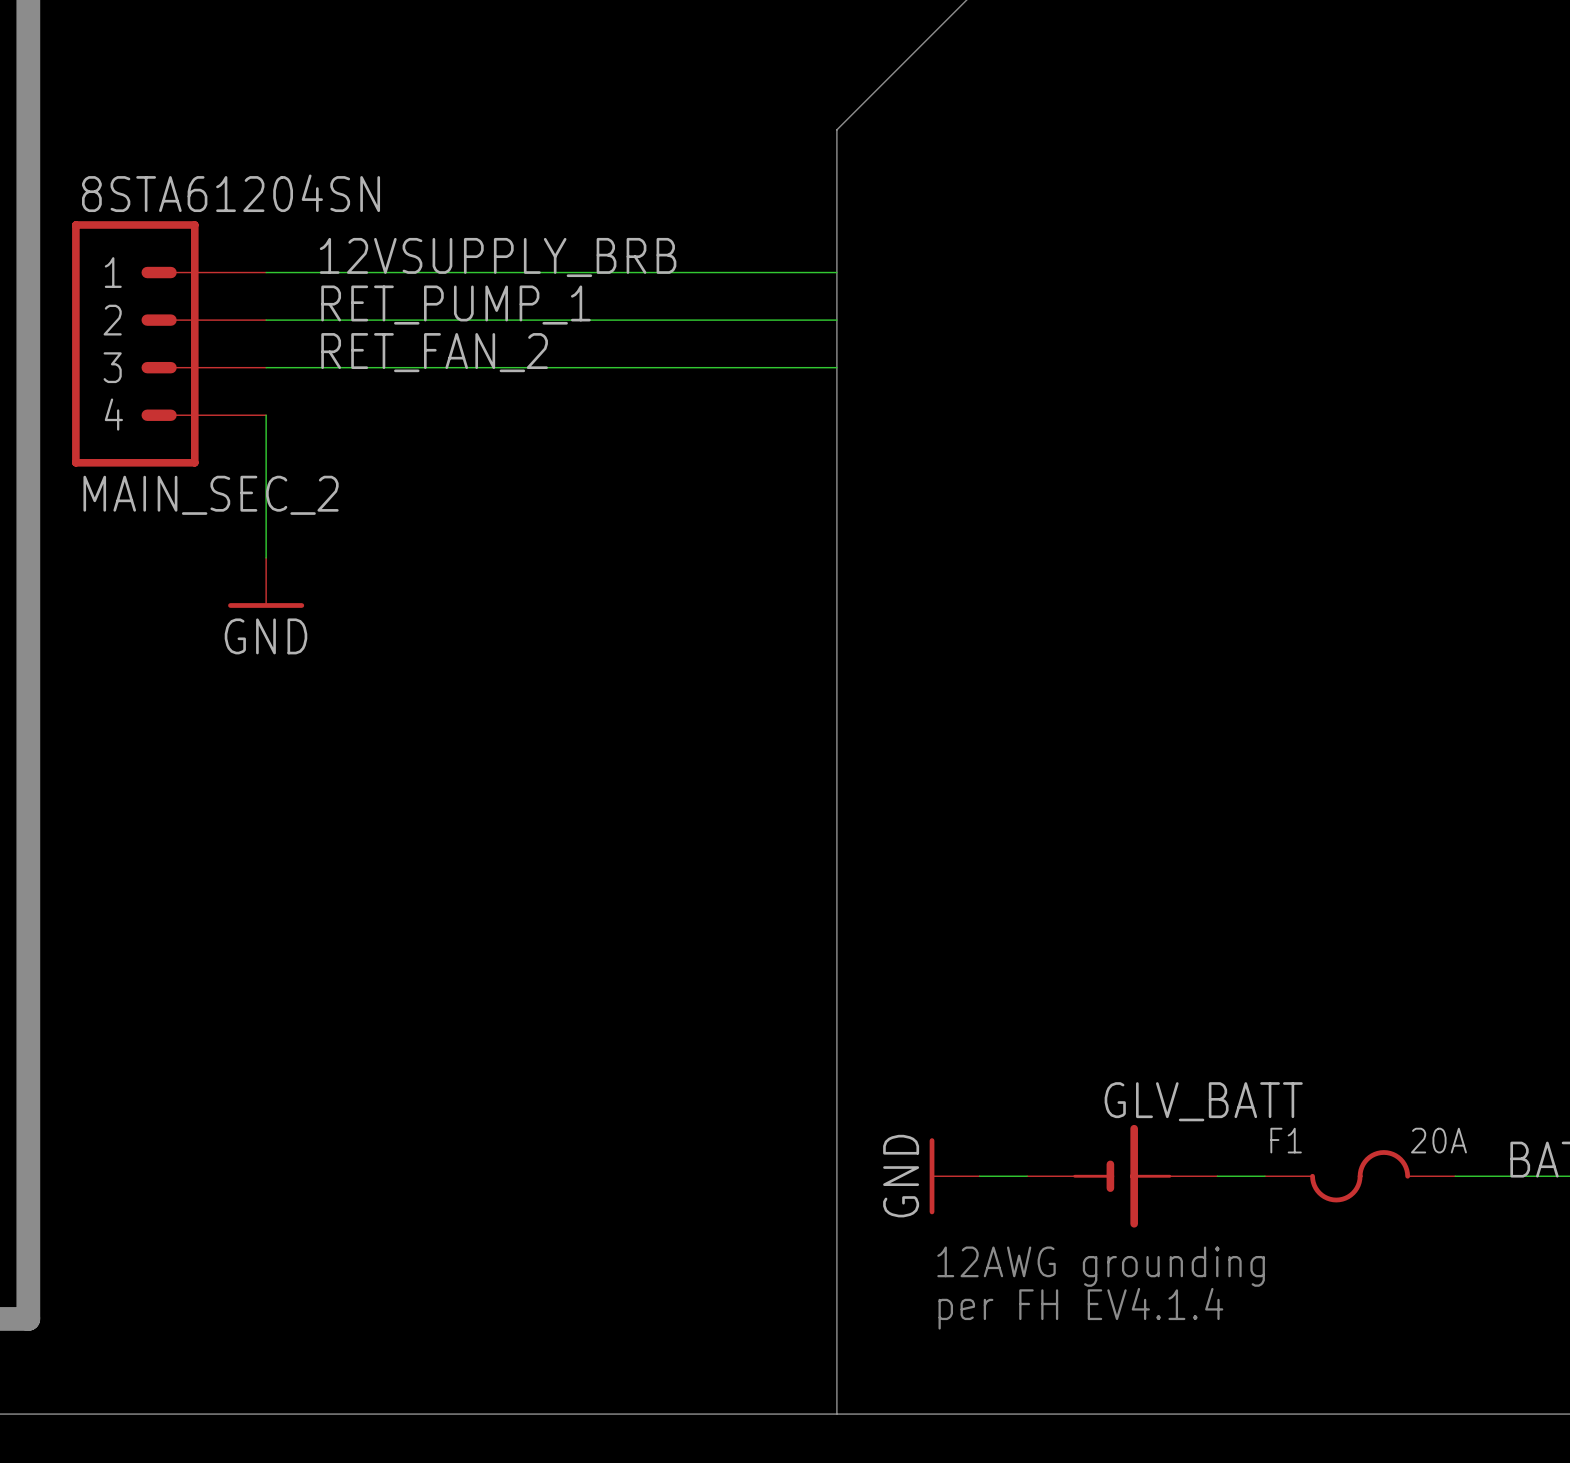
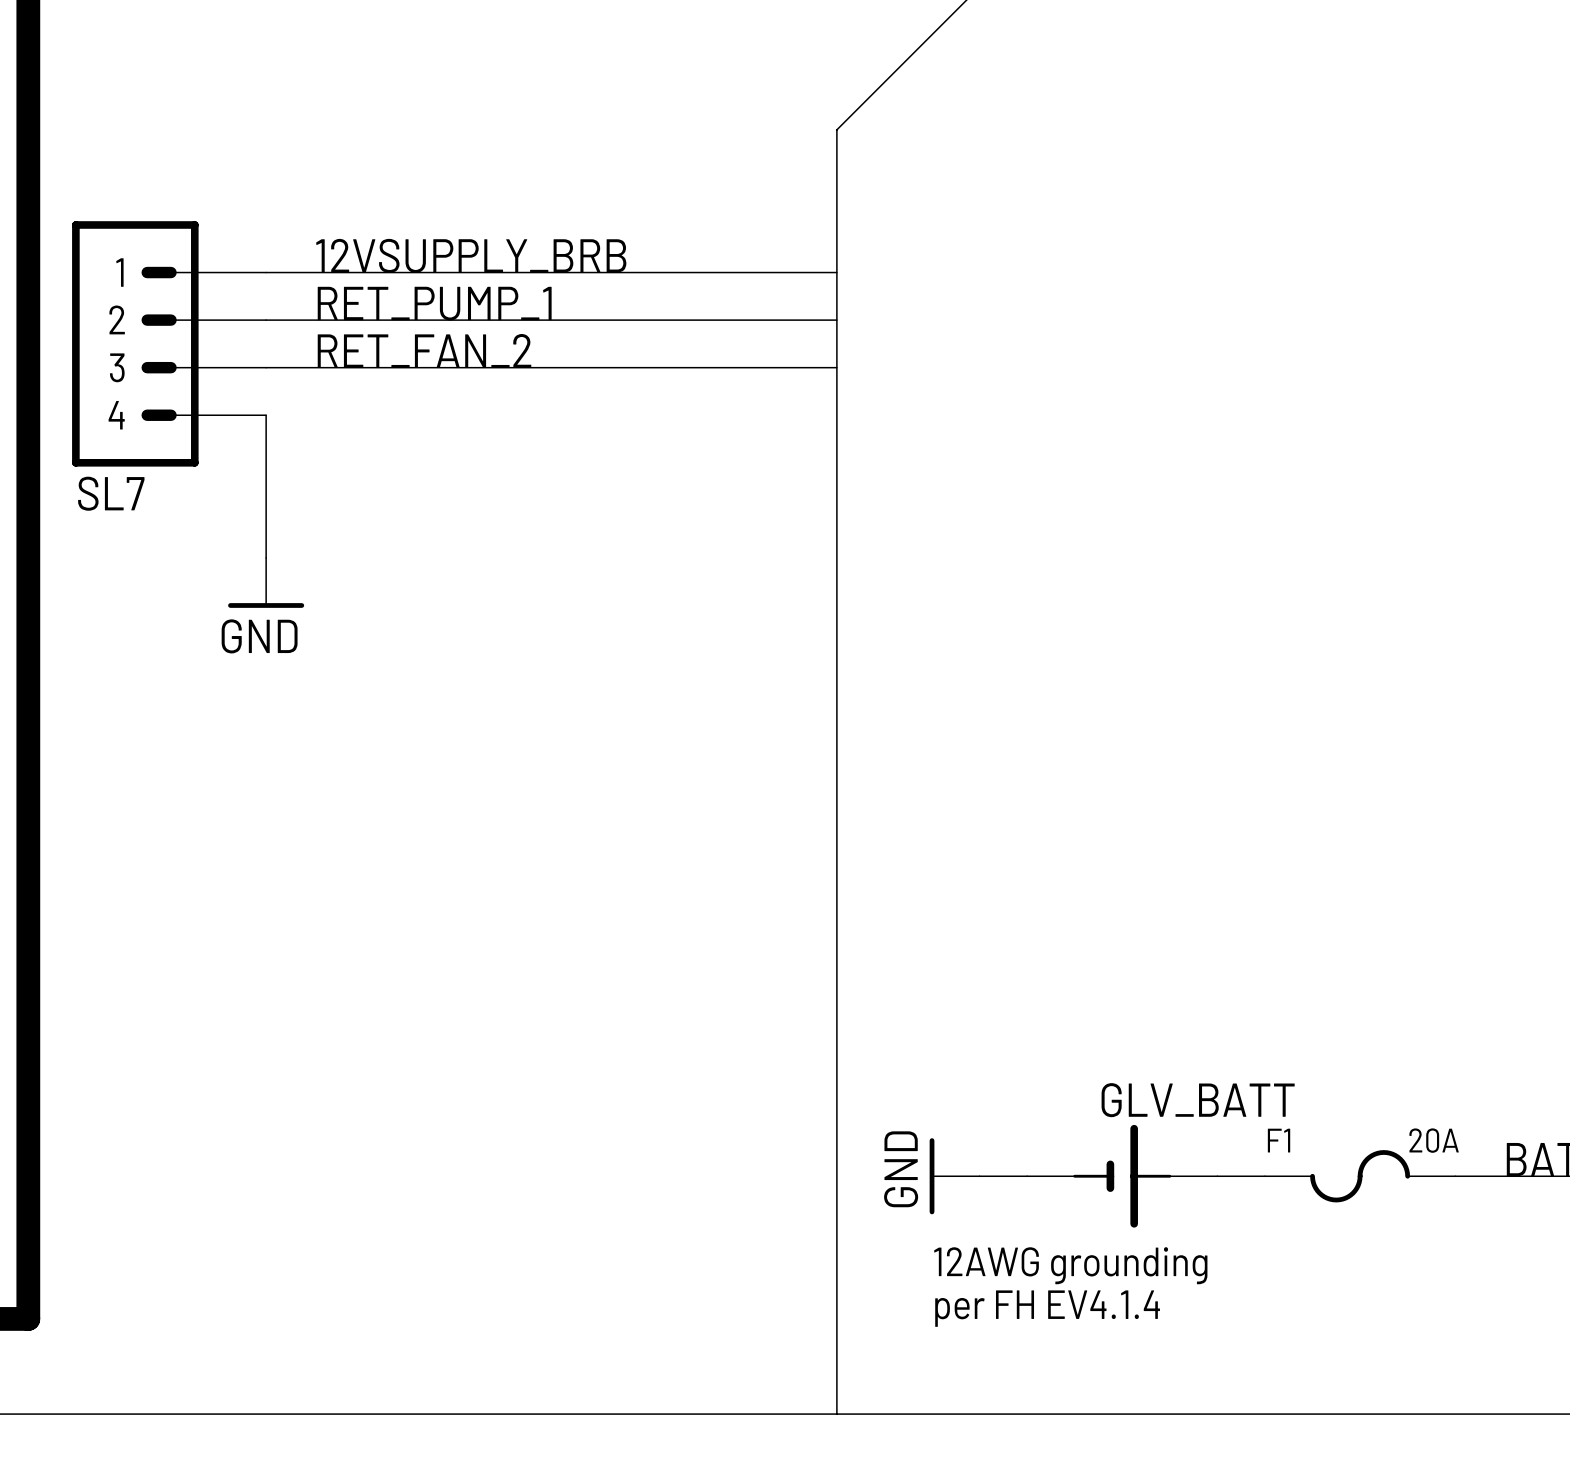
MAIN_SEC_2 value: 8STA61204SN (231, 193) -> none
MAIN_SEC_2 name: MAIN_SEC_2 (211, 495) -> SL7 (111, 493)

